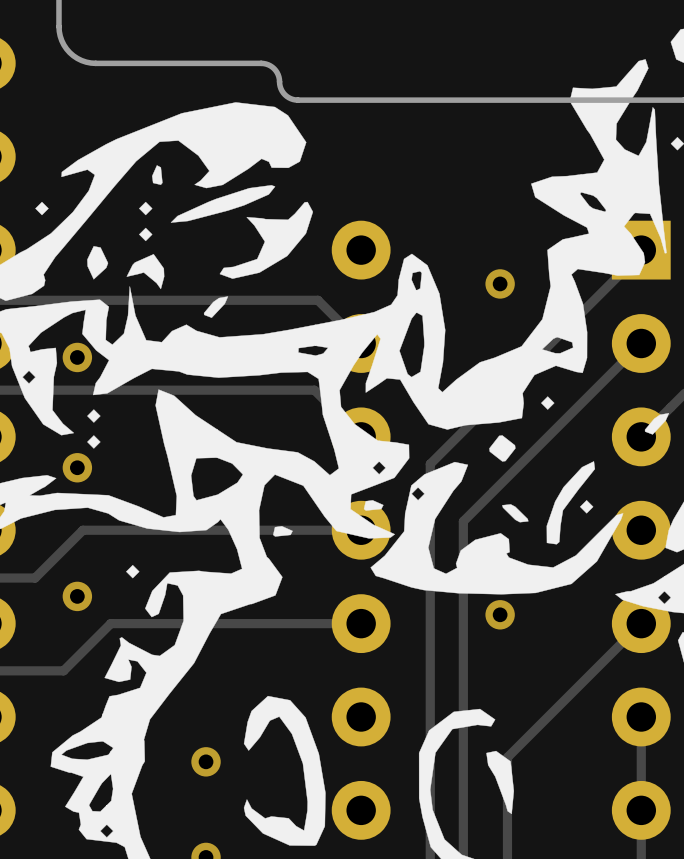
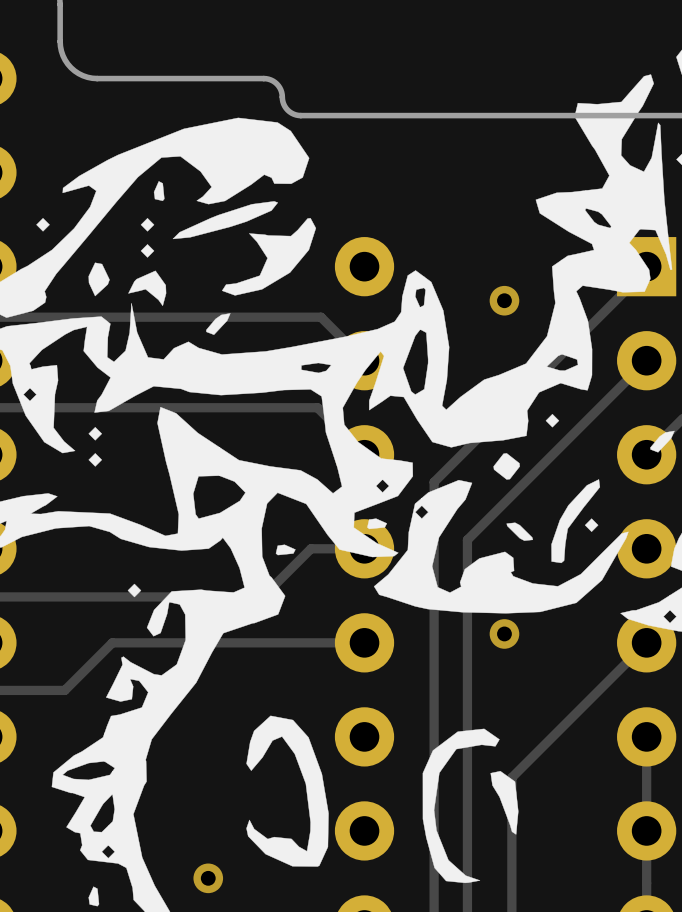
via: (77, 357) -> none
via: (77, 467) -> none
track: (308, 530) (82, 530) (35, 578) -> (311, 548) (262, 596) (36, 596)
via: (77, 596) -> none
via: (206, 761) -> none

